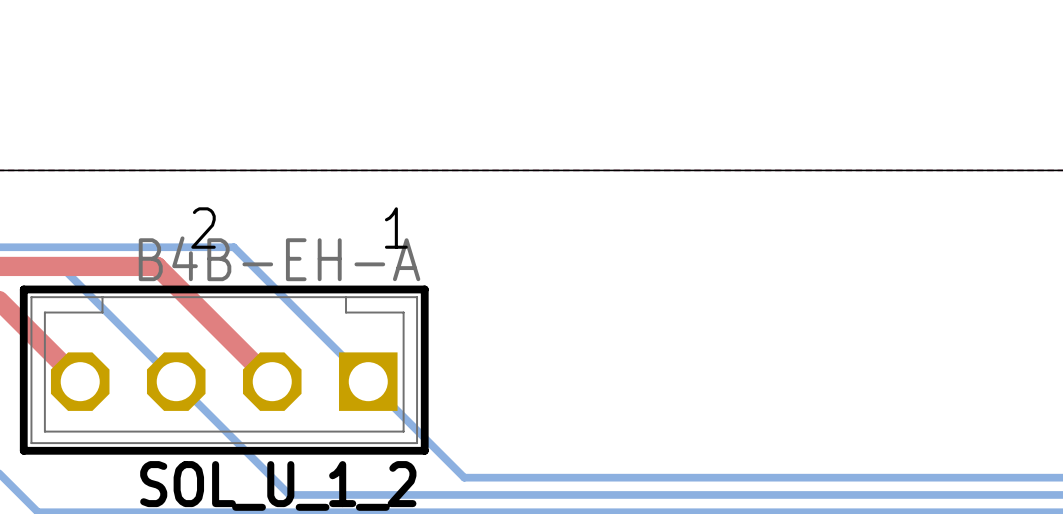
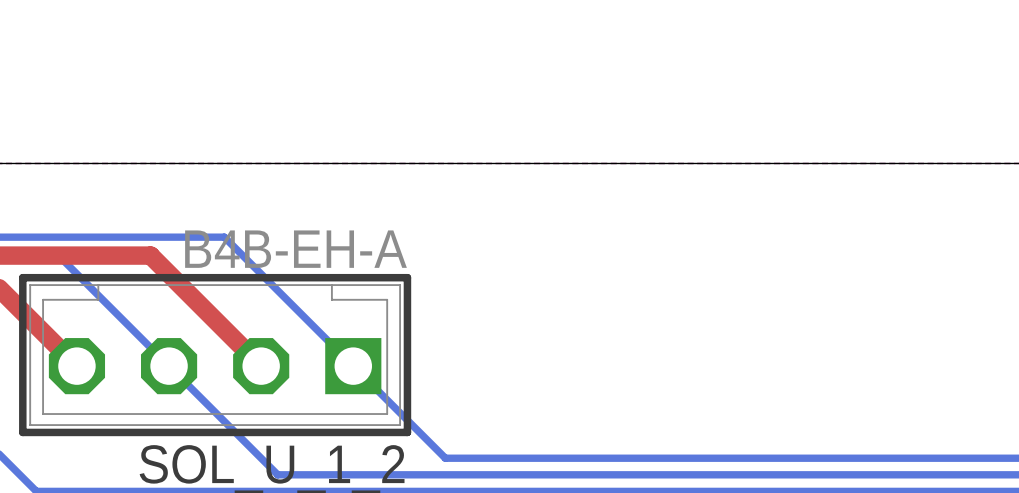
text: 2 (203, 228) -> none
text: 1 (396, 228) -> none

